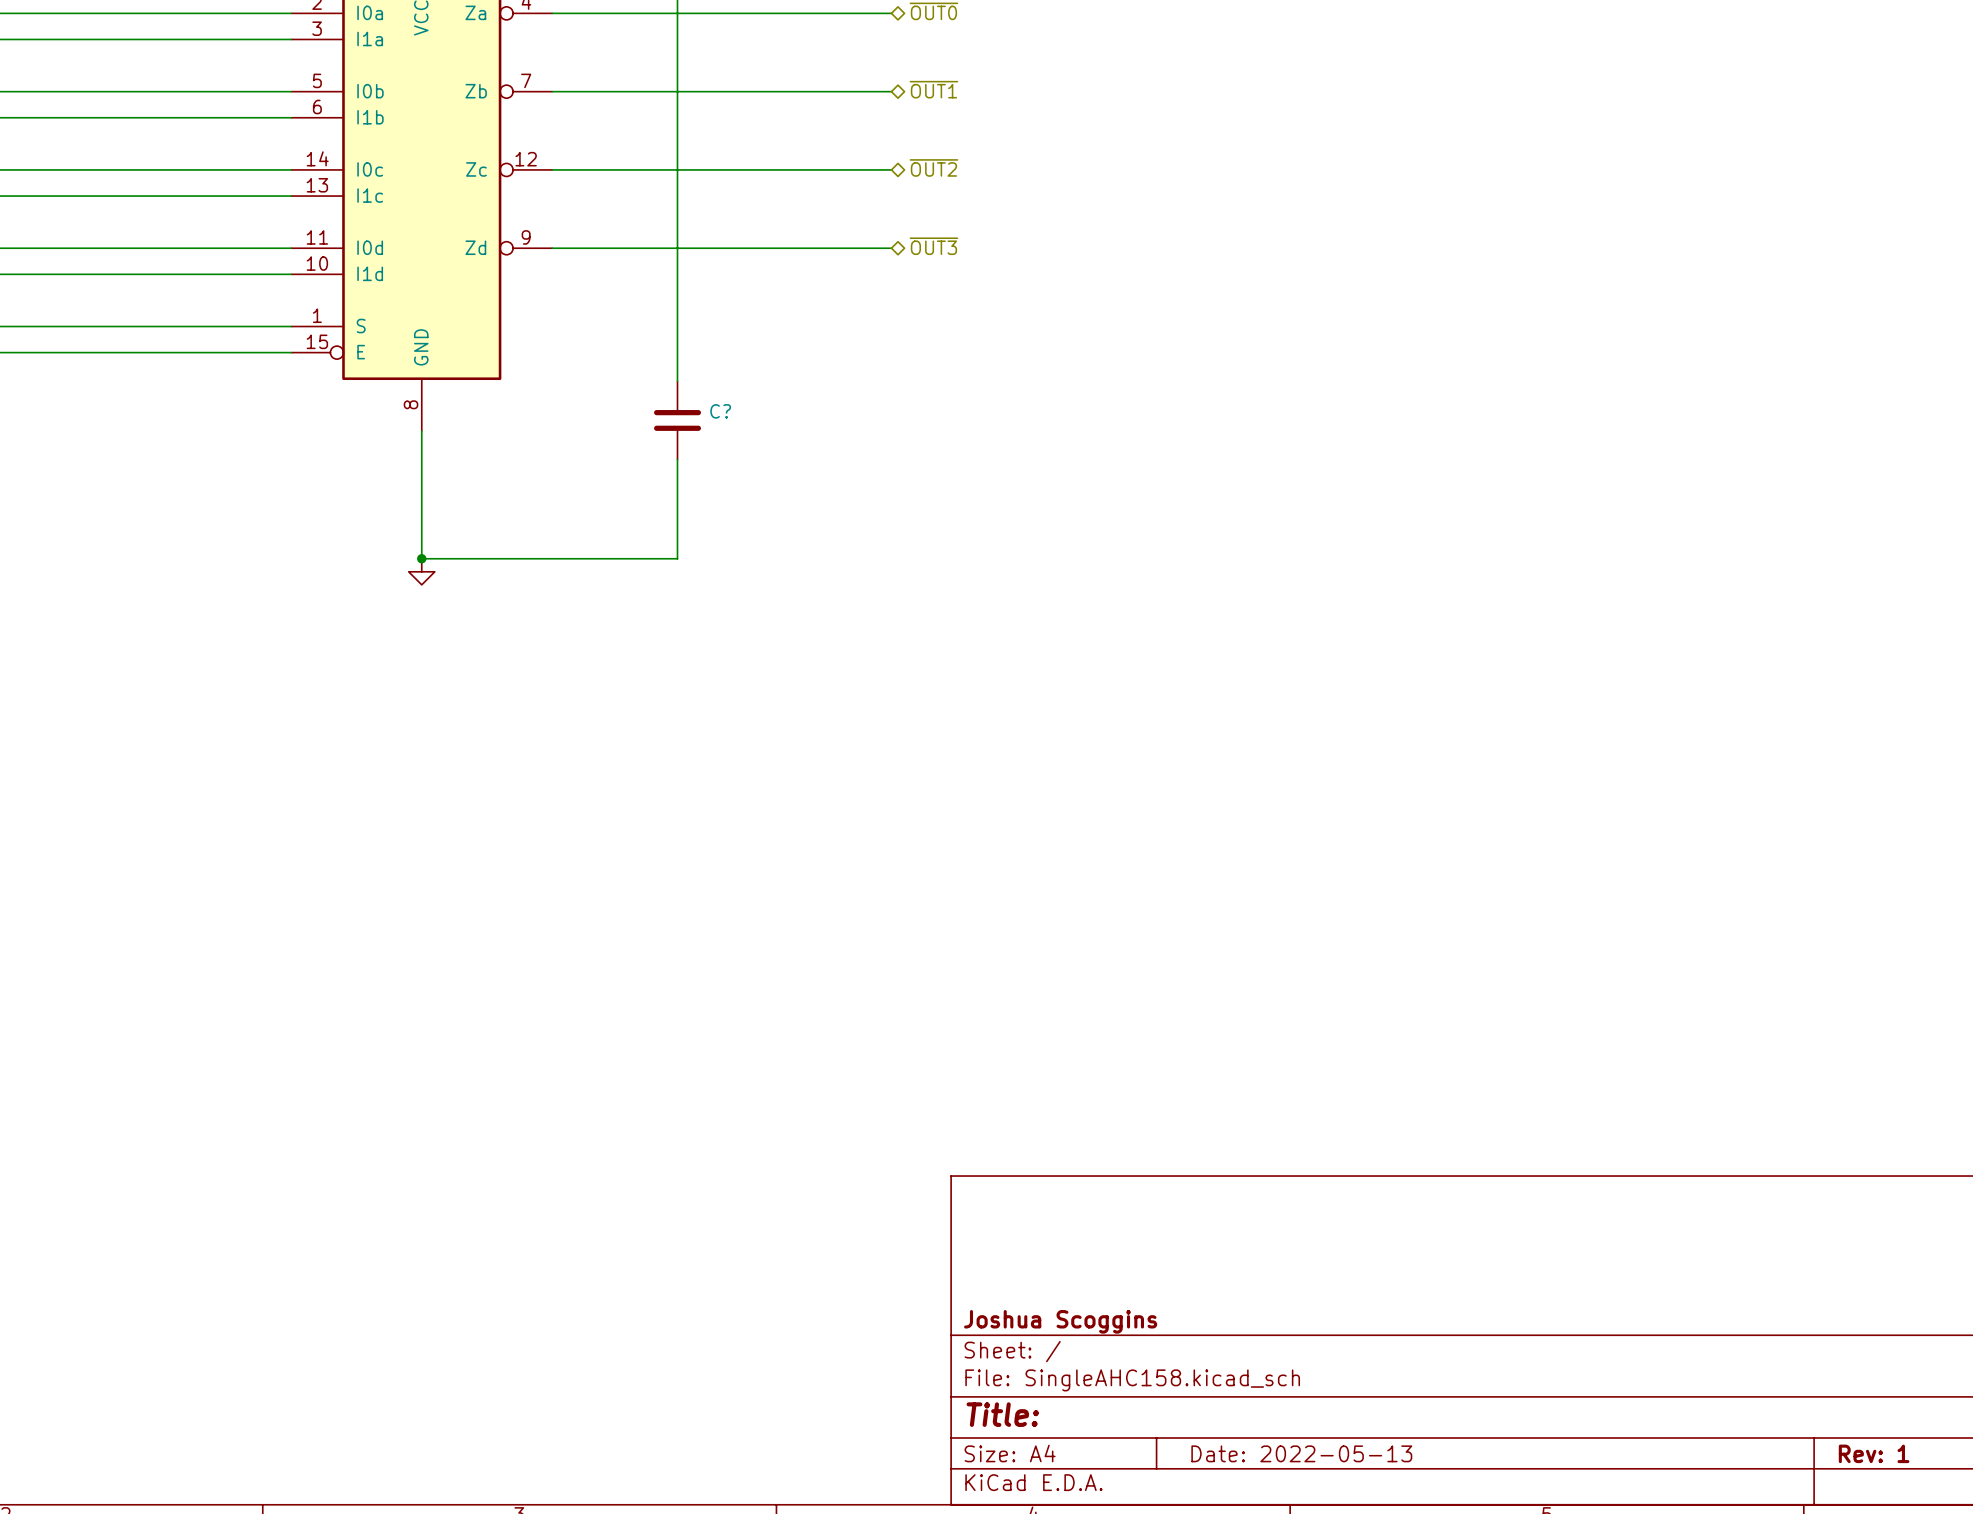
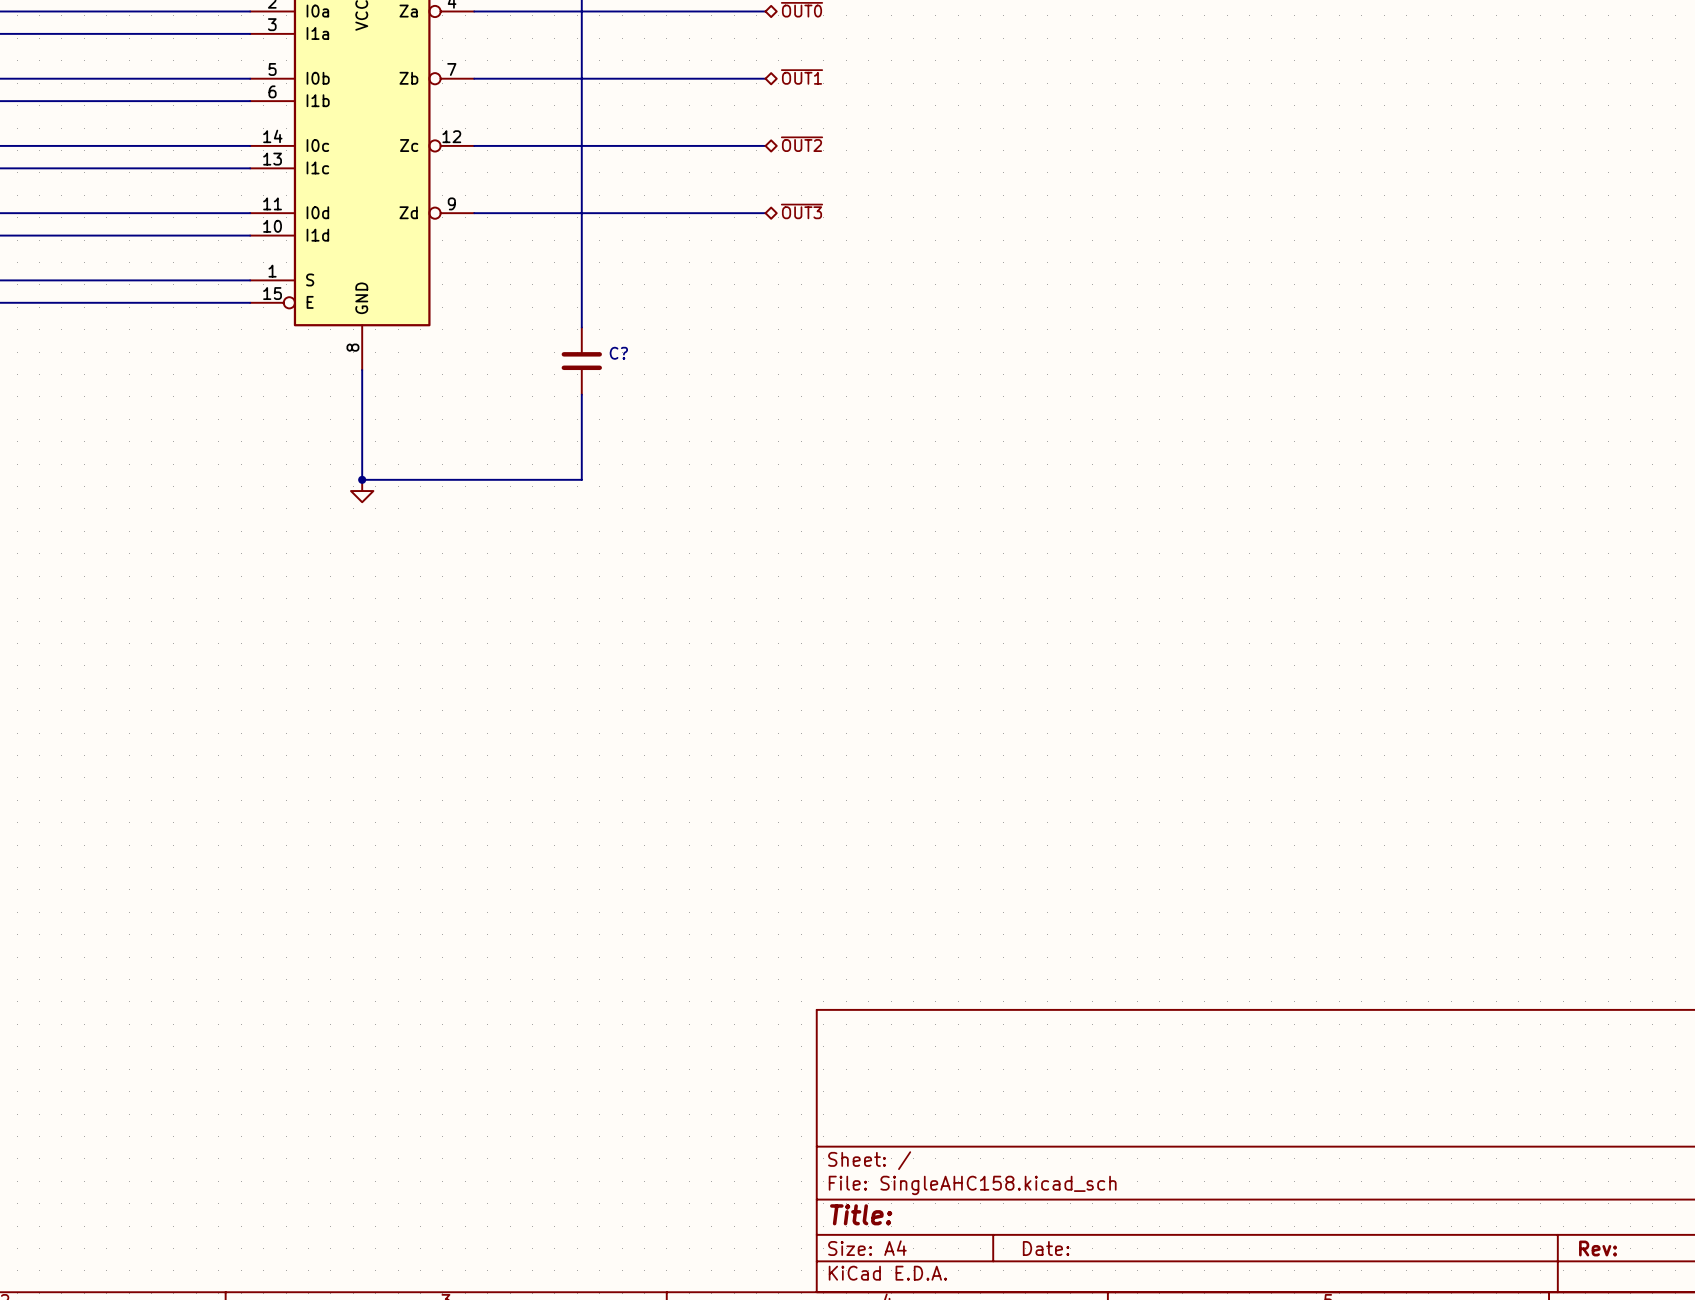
title block: Joshua Scoggins (1060, 1321) -> none
title block: Date: 2022-05-13 (1301, 1453) -> Date: (1046, 1248)
title block: Rev: 1 (1874, 1453) -> Rev: (1598, 1248)

